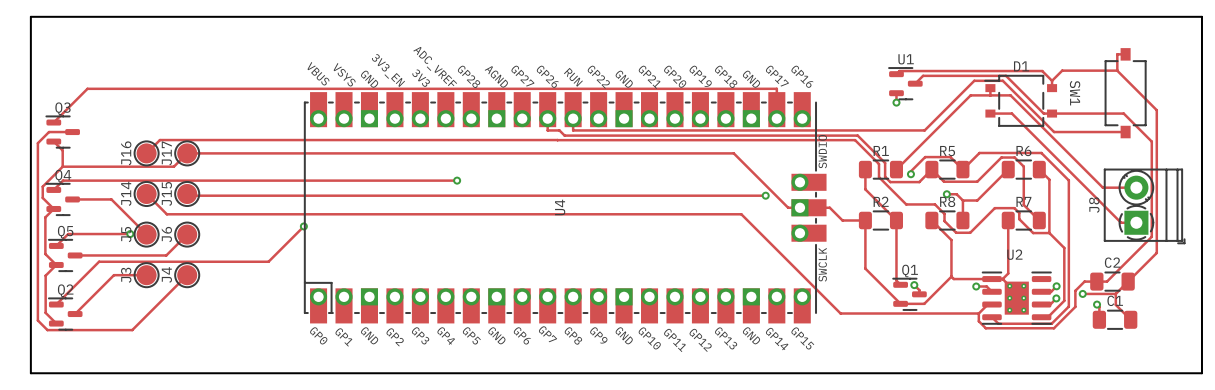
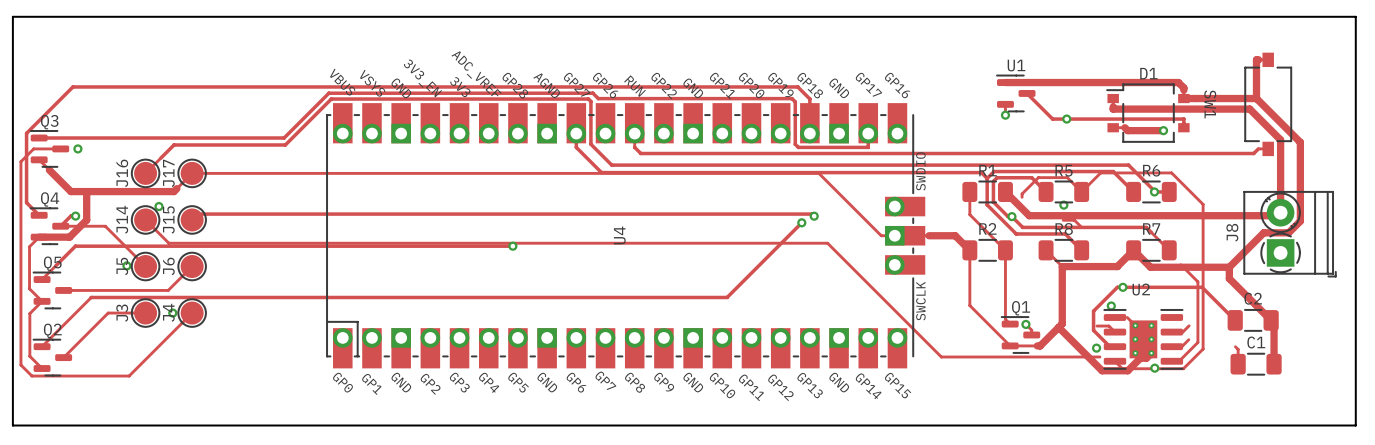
track: (1117, 54) (1117, 70) -> (1258, 59) (1256, 59) (1256, 98)
track: (896, 74) (899, 71) (1042, 71) (1052, 80) (1062, 70) (1117, 70) (1156, 110) (1156, 252) (1115, 293) -> (1005, 82) (1178, 82) (1183, 90)
track: (915, 83) (923, 75) (1006, 75) (1043, 113) (1123, 113) (1151, 141) (1151, 236) (1106, 281) (1084, 281) (1075, 290) (1075, 306) (1053, 328) (985, 328) (978, 321) (978, 313) (987, 304) -> (1027, 93) (1052, 119) (1183, 119) (1183, 127)
track: none -> (1183, 98) (1256, 98)
track: none -> (1256, 98) (1300, 142) (1300, 221) (1288, 232) (1263, 232) (1229, 267)
via: none -> (1066, 119)
track: (1000, 113) (1011, 113) (1121, 222) (1136, 222) -> (1124, 127) (1127, 130) (1163, 130)
via: none -> (1163, 130)
track: none -> (576, 133) (576, 147) (601, 172) (981, 172) (987, 178)
track: (547, 118) (547, 130) (559, 130) (564, 135) (857, 135) (885, 163) (885, 176) (890, 182) (919, 182) (931, 169) (943, 181) (977, 181) (1001, 157) (1014, 157) (1023, 166) (1023, 204) -> (1046, 191) (1031, 177) (997, 177) (993, 181) (993, 201) (1022, 227) (1146, 227) (1151, 232)
track: (776, 118) (776, 88) (87, 88) (53, 122) -> (868, 133) (868, 147) (798, 147) (795, 144) (795, 101) (792, 98) (598, 98) (592, 93) (328, 93) (284, 138) (39, 138)
track: (573, 130) (924, 130) (974, 80) (1002, 80) (1054, 132) (1117, 132) -> (634, 147) (640, 153) (1253, 153) (1258, 148)
via: none -> (77, 148)
track: (159, 140) (557, 140) -> none
track: (557, 140) (855, 140) (879, 164) (879, 177) (906, 204) (934, 204) (944, 214) (944, 221) (956, 232) (970, 232) (994, 208) (1014, 208) (1019, 213) (1019, 219) (1033, 233) (1049, 233) (1049, 179) (1039, 169) -> (160, 158) (174, 144) (285, 144) (331, 99) (588, 99) (590, 101) (590, 144) (611, 165) (1128, 165) (1154, 191) (1169, 191)
track: (62, 150) (62, 166) -> none
track: none -> (987, 178) (987, 204) (1016, 233) (1065, 233) (1081, 250)
track: (62, 166) (173, 166) -> (49, 170) (70, 191) (173, 191) (176, 188)
track: (62, 166) (42, 186) (42, 197) (53, 208) -> (86, 191) (86, 220) (69, 237) (39, 237)
track: (896, 169) (970, 95) (1010, 95) (1102, 187) (1136, 187) -> (1005, 191) (1029, 215) (1277, 215) (1280, 212) (1280, 139) (1249, 109) (1113, 109) (1113, 106)
track: (1008, 169) (977, 200) (962, 200) (962, 220) -> (1133, 191) (1113, 171) (994, 171) (987, 178)
via: none -> (1154, 191)
via: (910, 174) -> none
track: (457, 180) (63, 180) (53, 189) -> (809, 133) (809, 99) (797, 86) (72, 86) (26, 133) (26, 202) (39, 215)
via position: (457, 180) -> (512, 246)
via: none -> (159, 206)
track: none -> (75, 216) (70, 216) (60, 226)
via: none -> (75, 216)
via: none -> (814, 216)
via: none -> (1011, 216)
track: (187, 193) (188, 195) (765, 195) -> (192, 219) (198, 214) (812, 214) (814, 216)
via position: (946, 194) -> (1063, 205)
via: (765, 195) -> none
via: none -> (801, 222)
track: (829, 207) (842, 220) (865, 220) -> (929, 235) (955, 235) (969, 250)
track: (1008, 220) (1008, 273) (1002, 279) (953, 279) (951, 276) -> none
track: (303, 226) (268, 261) (99, 261) -> (801, 222) (727, 297) (91, 297)
via: (303, 226) -> none
track: (68, 234) (130, 234) -> (55, 265) (75, 246) (512, 246)
track: (946, 234) (951, 240) (951, 276) -> none
via: none -> (1122, 287)
via: none -> (1111, 305)
via: none -> (172, 313)
track: (951, 276) (924, 303) -> (1229, 267) (1150, 267) (1133, 250) (1117, 266) (1062, 266) (1062, 323) (1040, 345) (1037, 345)
track: none -> (1235, 320) (1202, 287) (1117, 287) (1093, 311) (1093, 330) (1110, 346)
via: (976, 286) -> none
via: (1056, 286) -> none
track: none -> (1058, 327) (1102, 370) (1127, 370) (1140, 358) (1146, 358) (1151, 353)
track: (1082, 293) (1115, 293) -> none
via: (1082, 293) -> none
track: (1115, 293) (1115, 304) (1130, 319) -> (1229, 267) (1229, 278) (1274, 323) (1274, 364)
via: (1056, 298) -> none
via: (1097, 304) -> none
via: none -> (1096, 348)
via: none -> (1154, 368)

